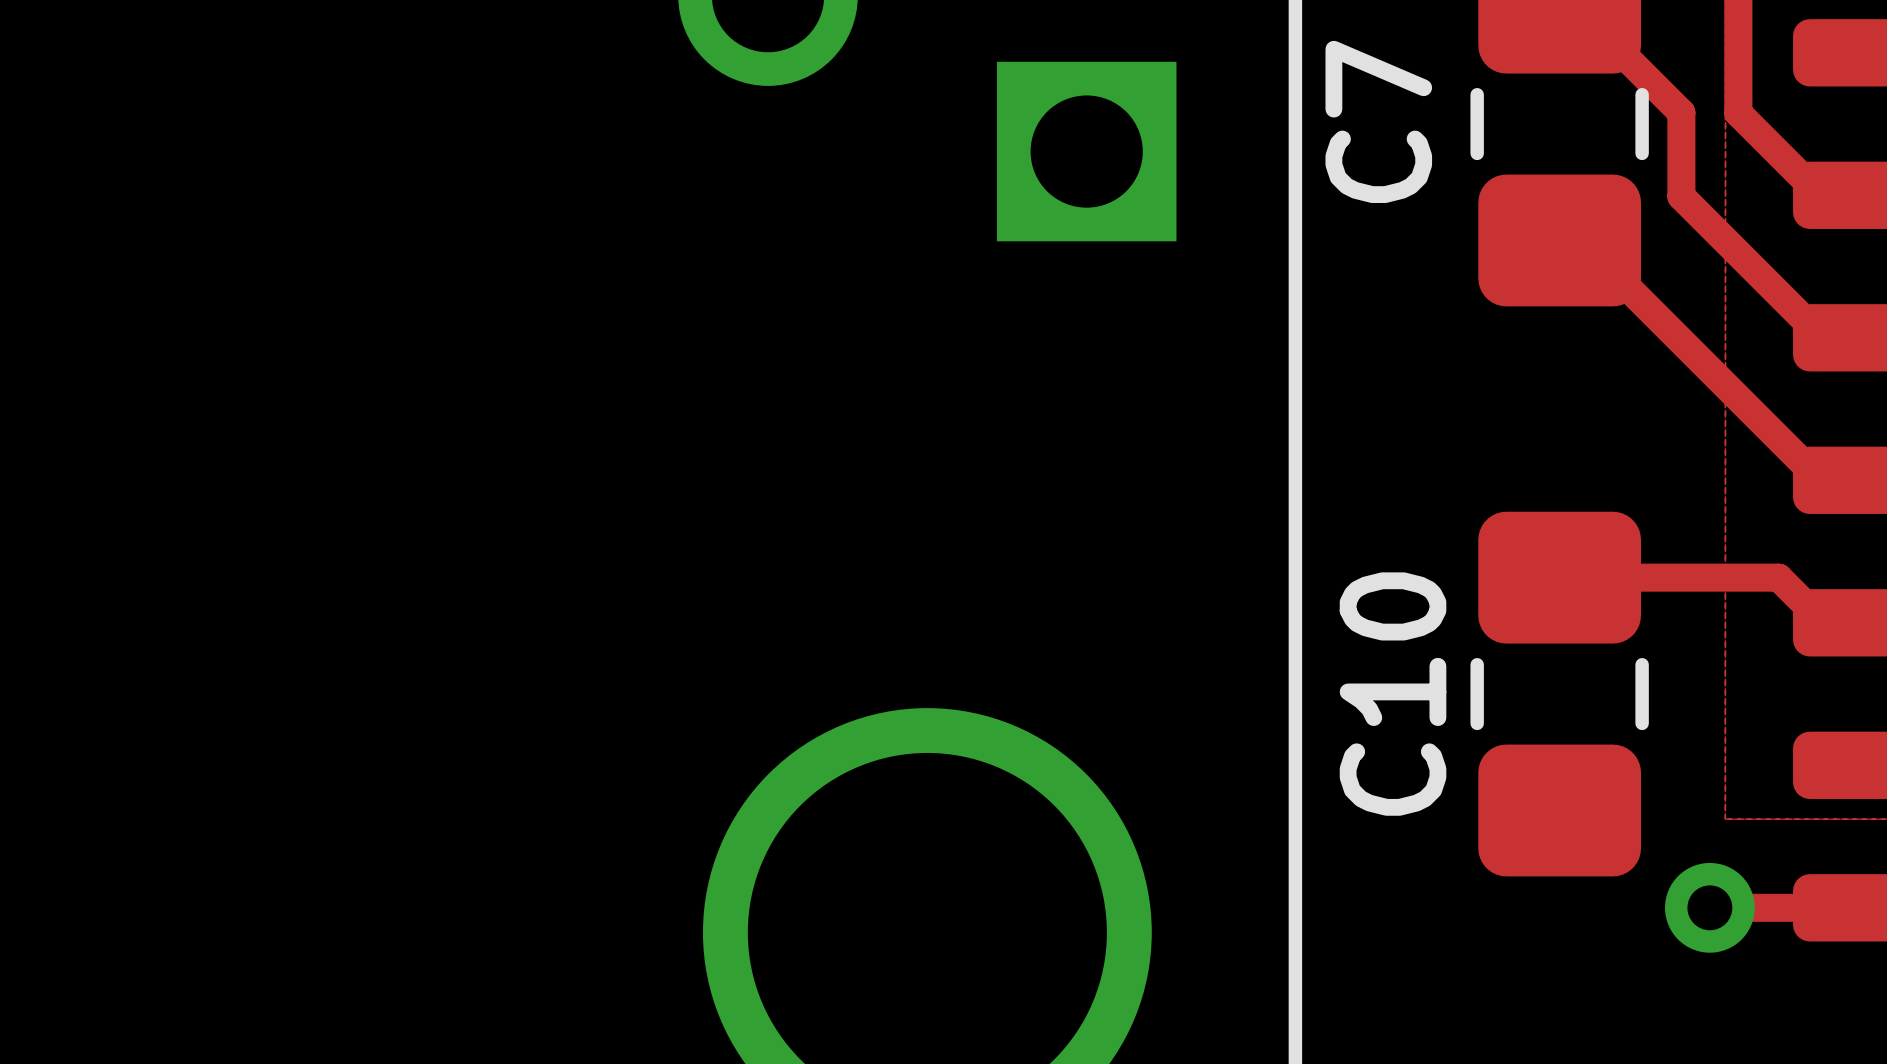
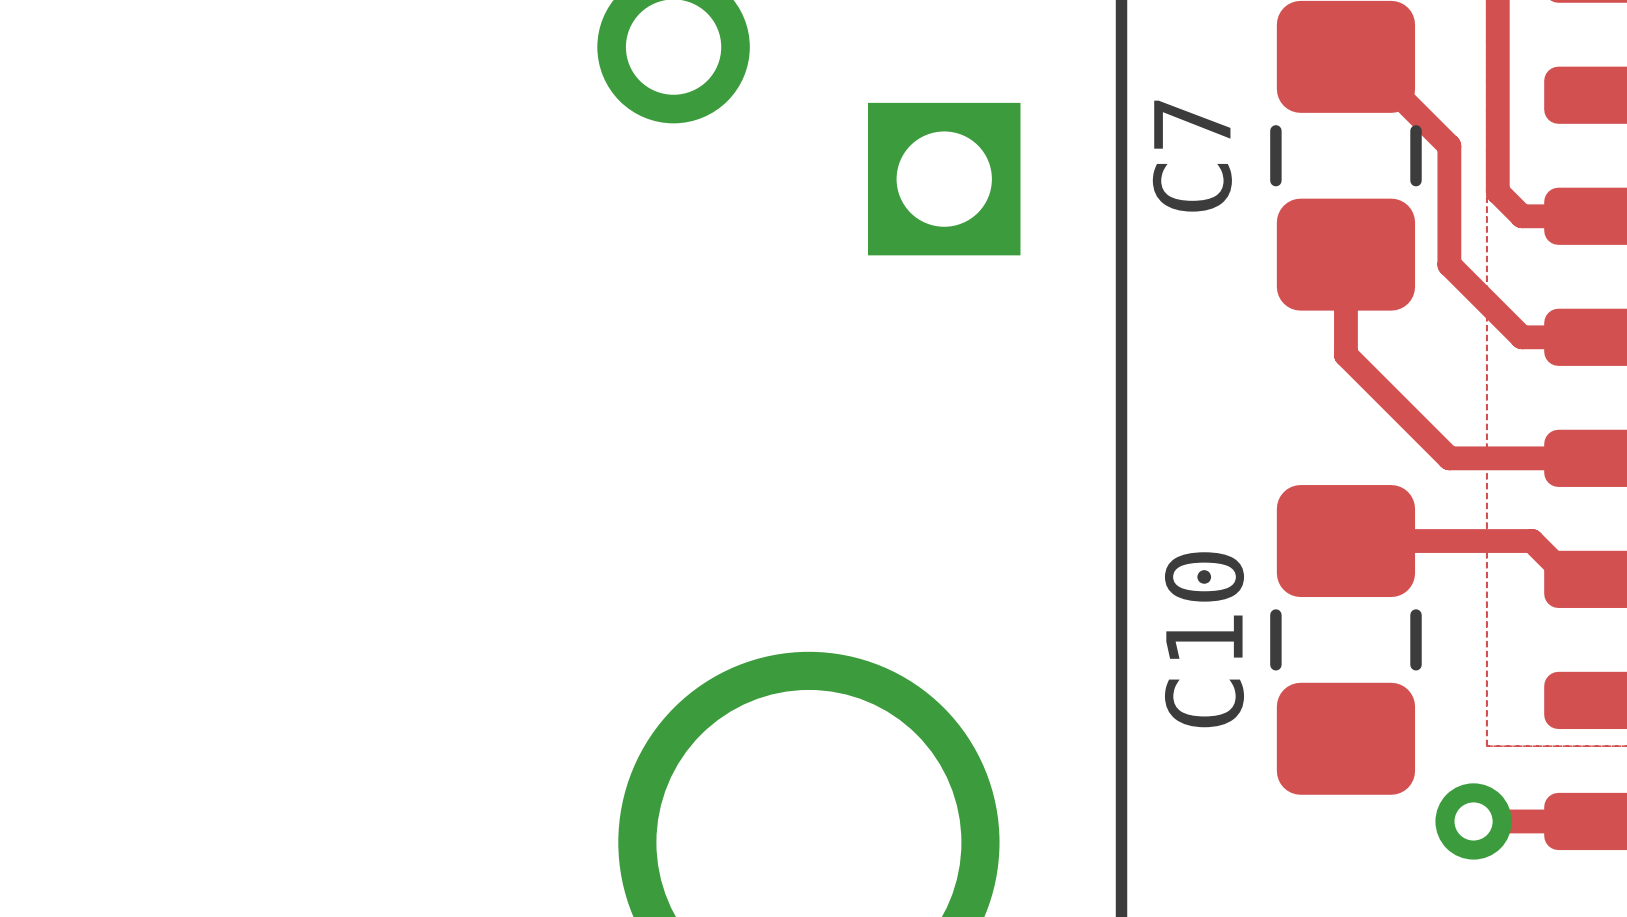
track: (1738, 113) (1820, 195) -> (1497, 146) (1497, 192) (1521, 216) (1567, 216)
track: (1681, 196) (1822, 337) -> (1449, 217) (1449, 264) (1521, 337) (1569, 337)
track: (1559, 240) (1580, 240) (1820, 480) -> (1345, 254) (1345, 354) (1449, 458) (1567, 458)

